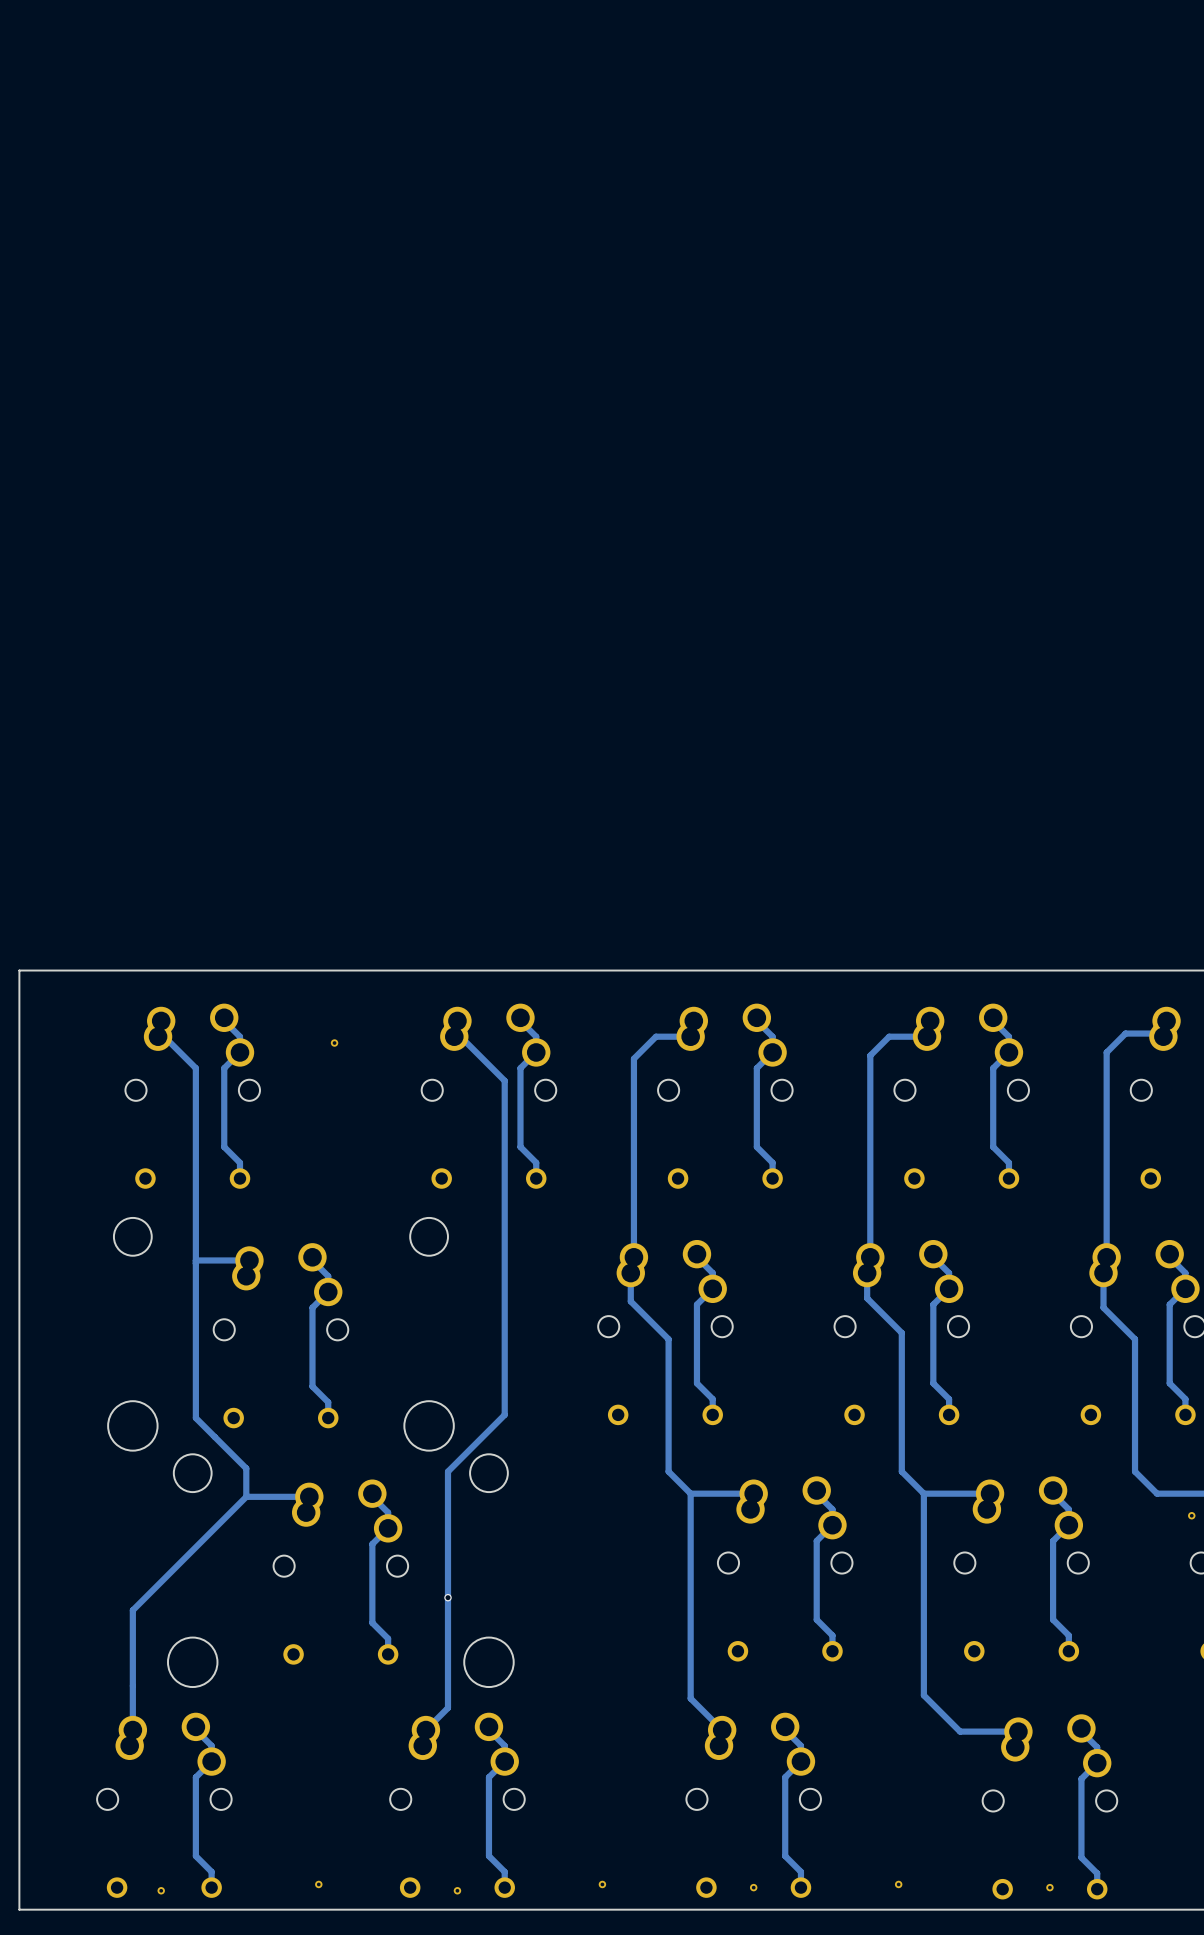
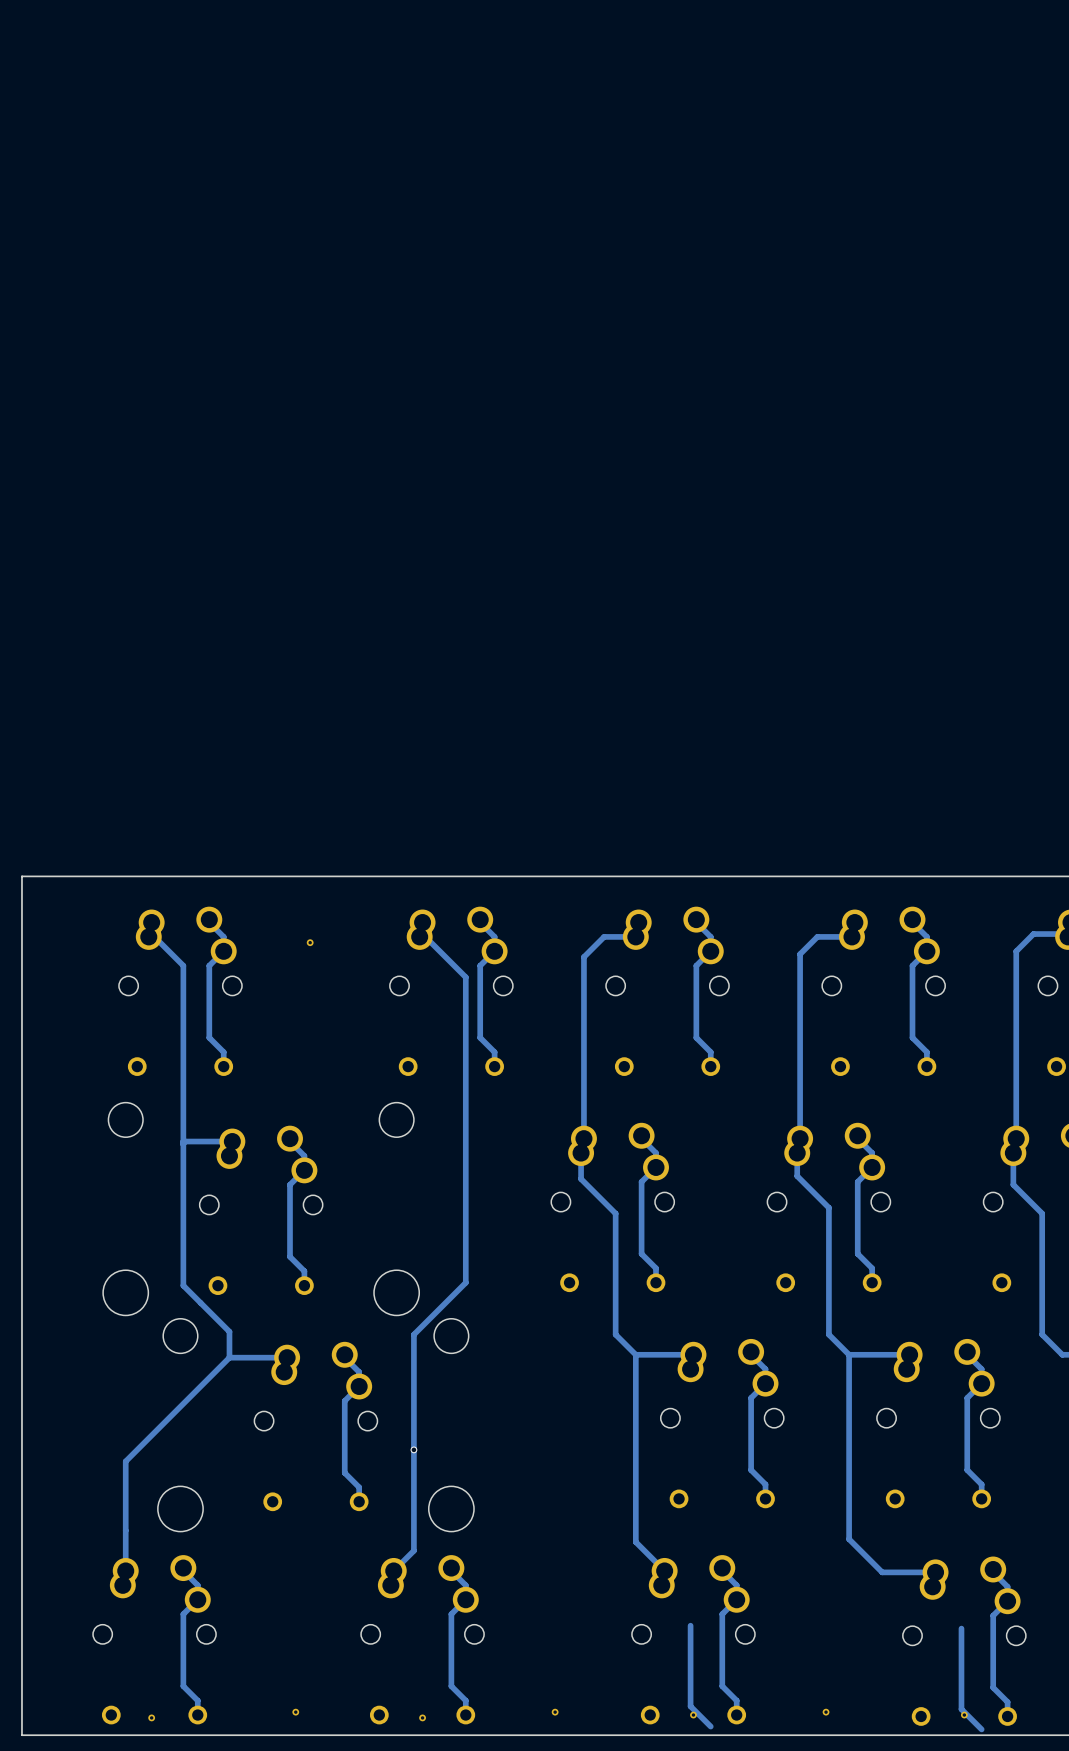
track: none -> (690, 1625) (690, 1706) (710, 1726)
track: none -> (961, 1628) (961, 1709) (981, 1729)

